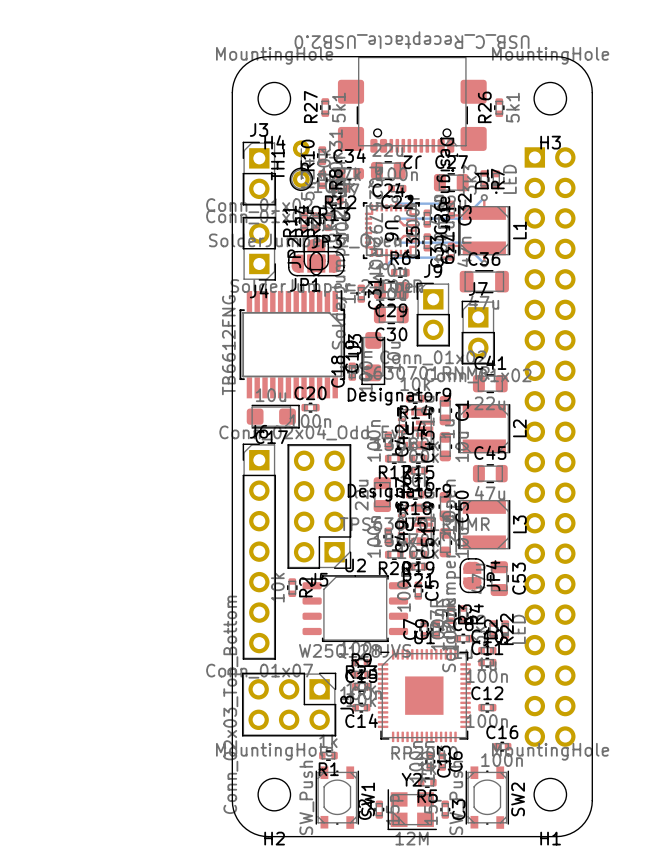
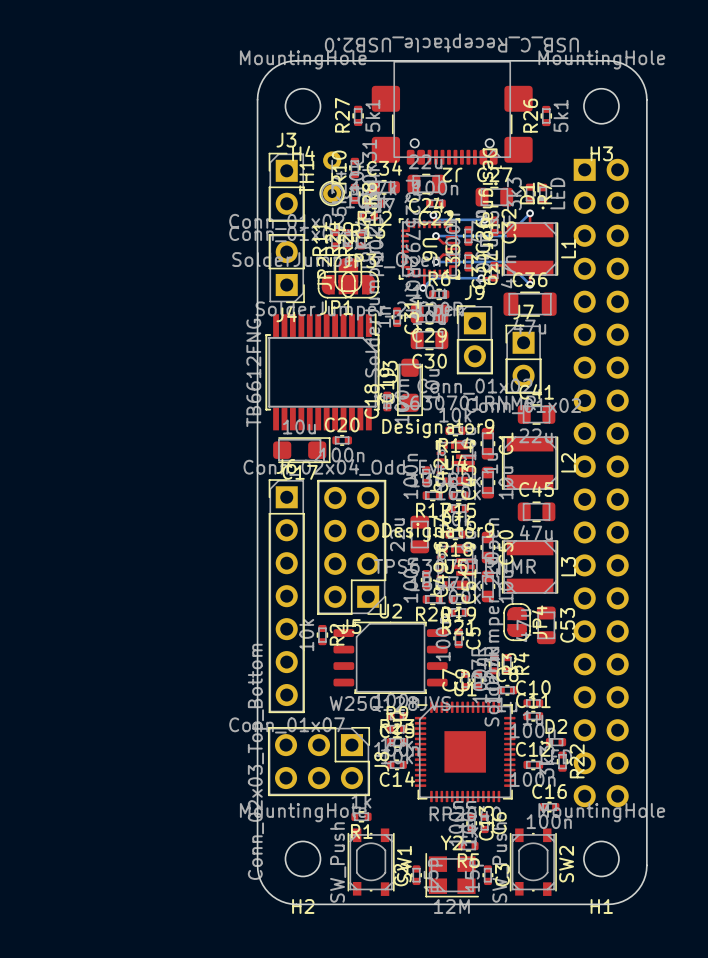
R22 position: (493, 629) -> (562, 761)
D2 rotation: 0° (505, 632) -> 90° clockwise (553, 742)
D2 position: (505, 632) -> (553, 742)

